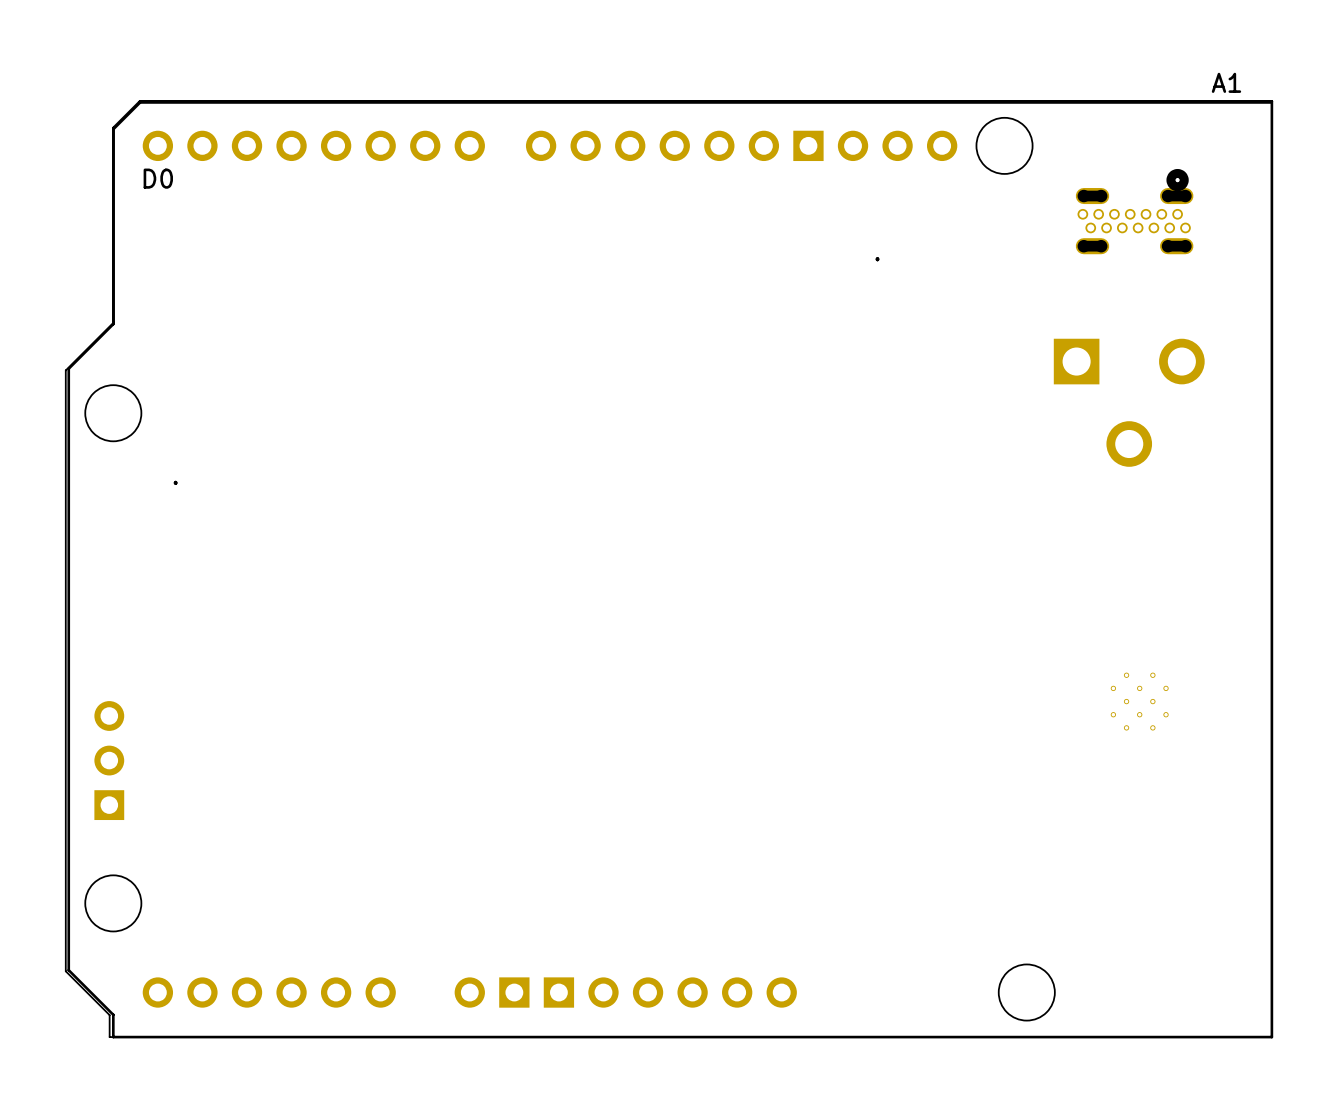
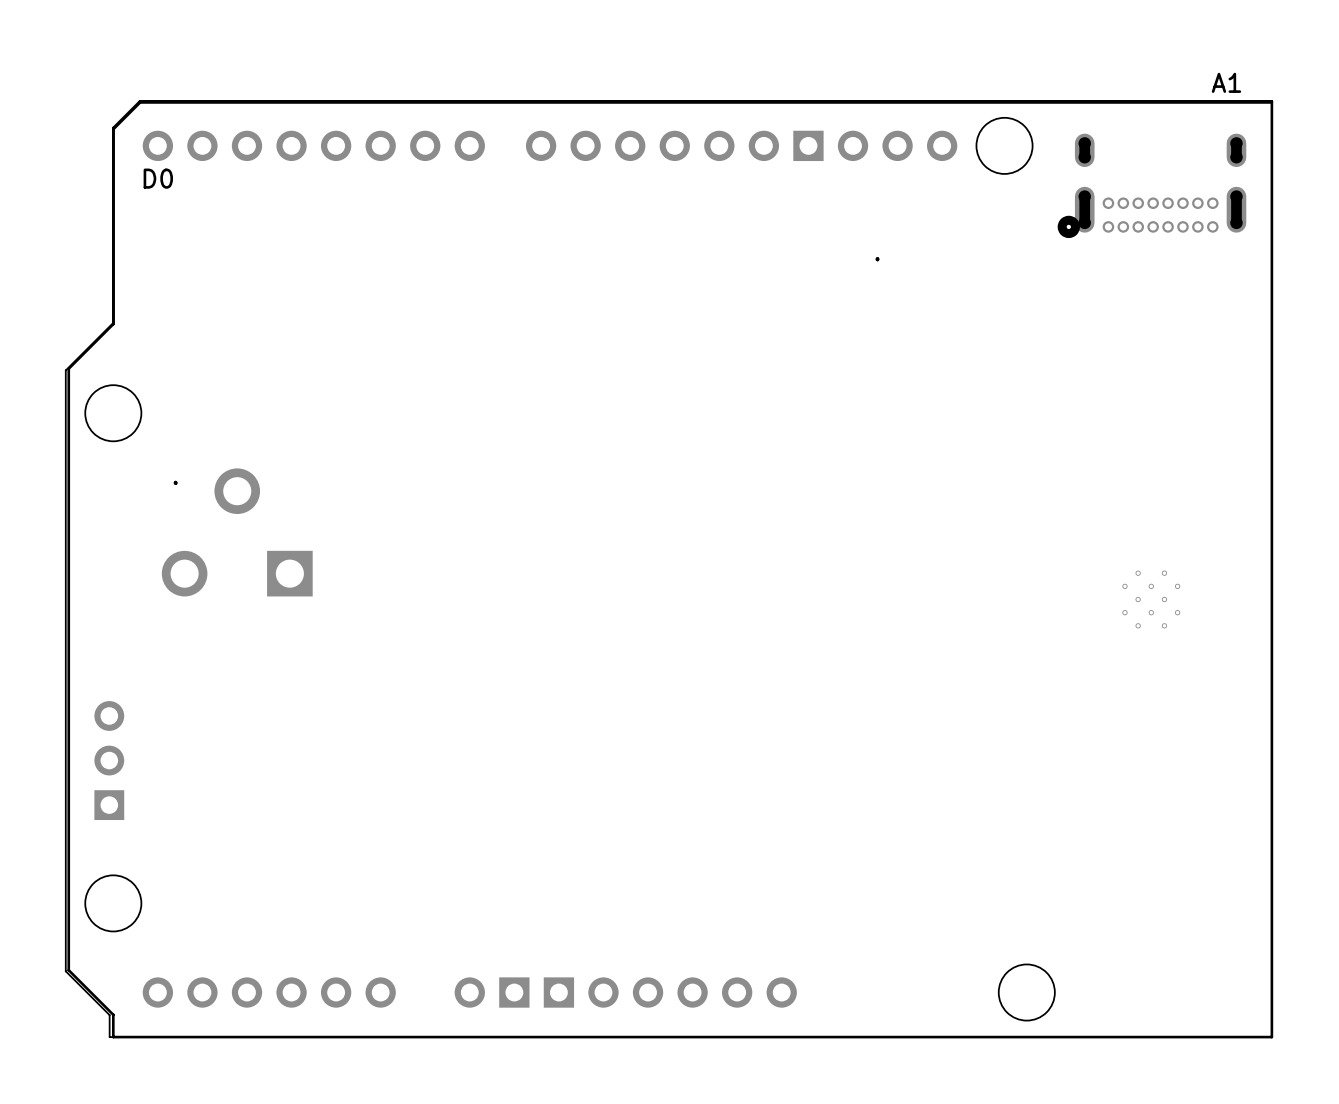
part: none -> (1151, 185)
part: (1134, 211) -> none
part: (1129, 402) -> none
part: none -> (237, 532)
part position: (1139, 701) -> (1151, 599)

